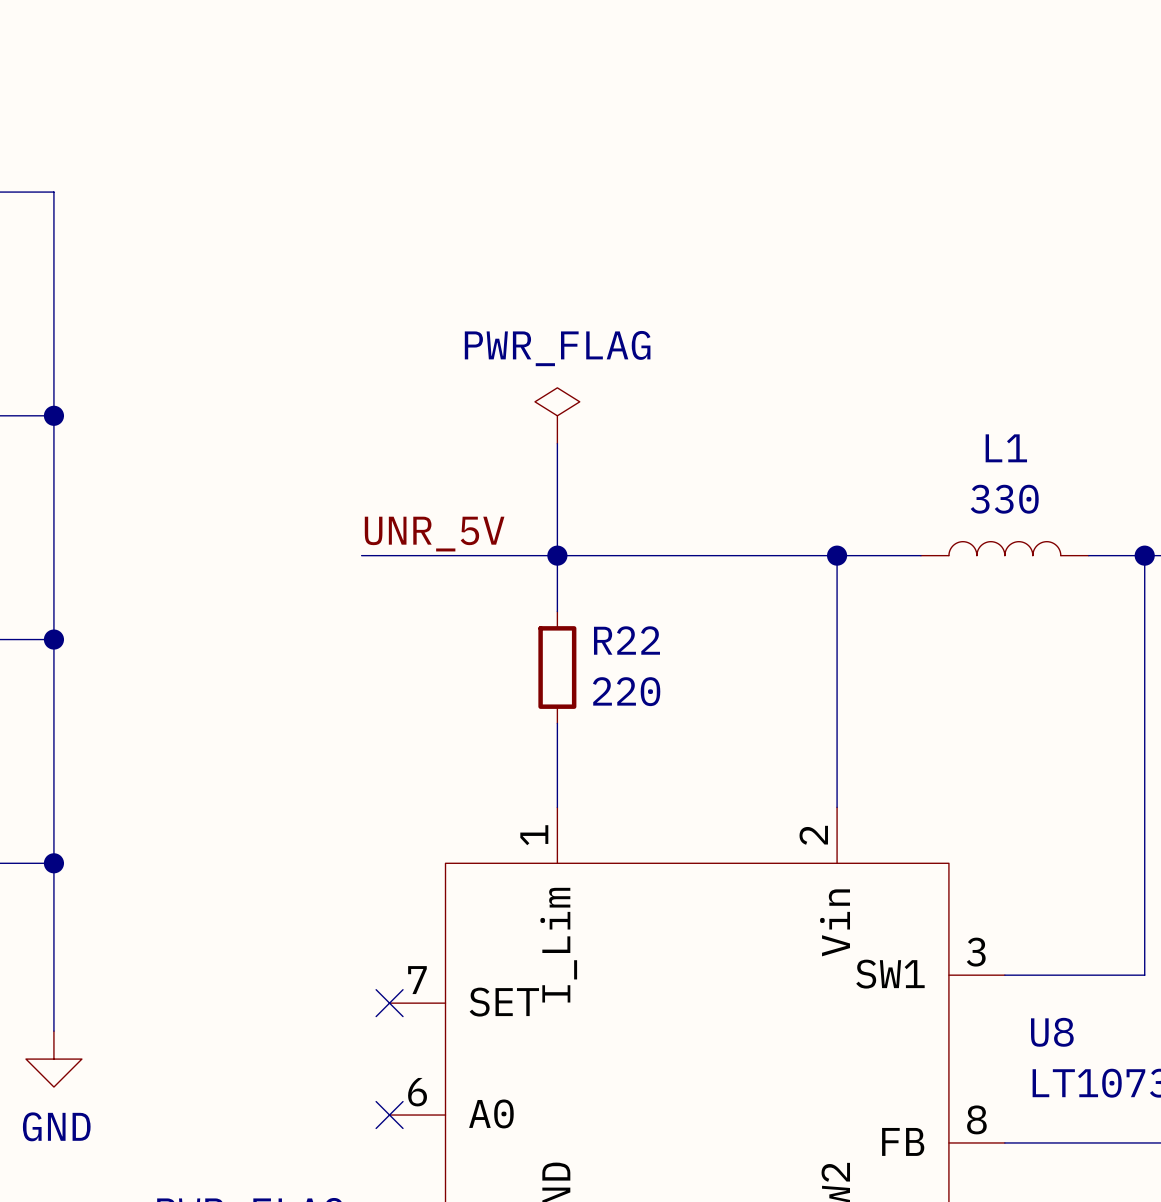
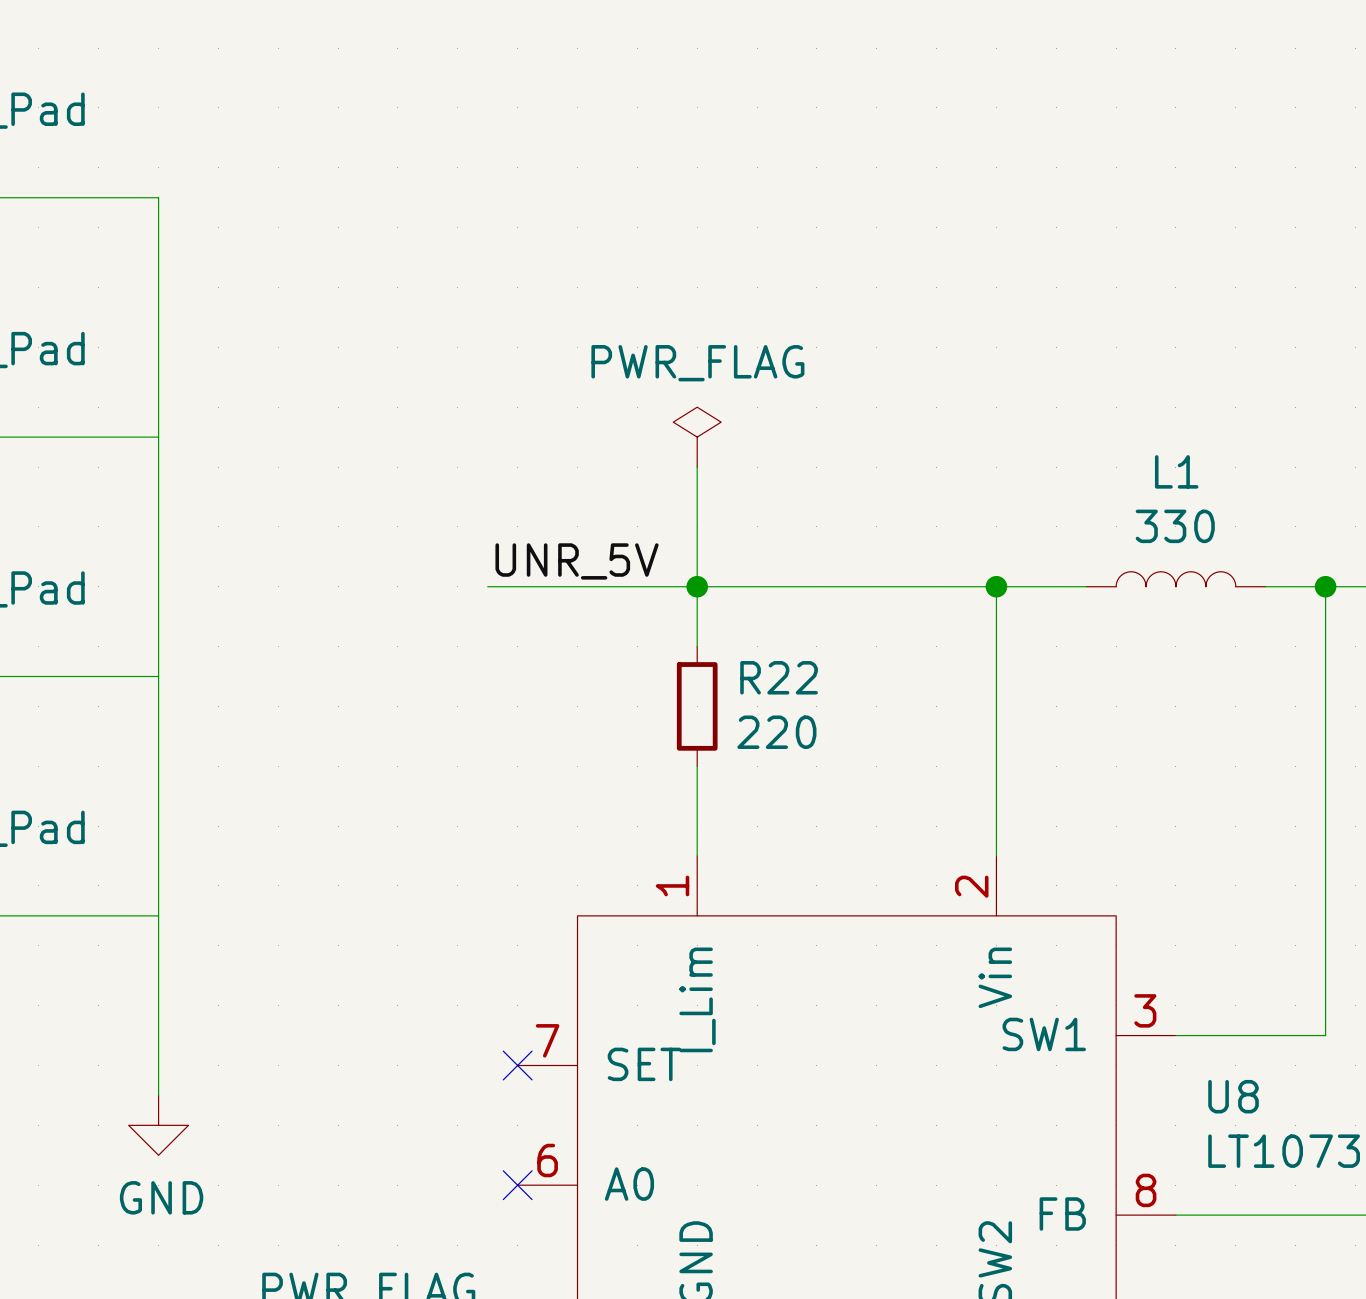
junction: (53, 415) -> none
junction: (53, 639) -> none
junction: (53, 863) -> none

